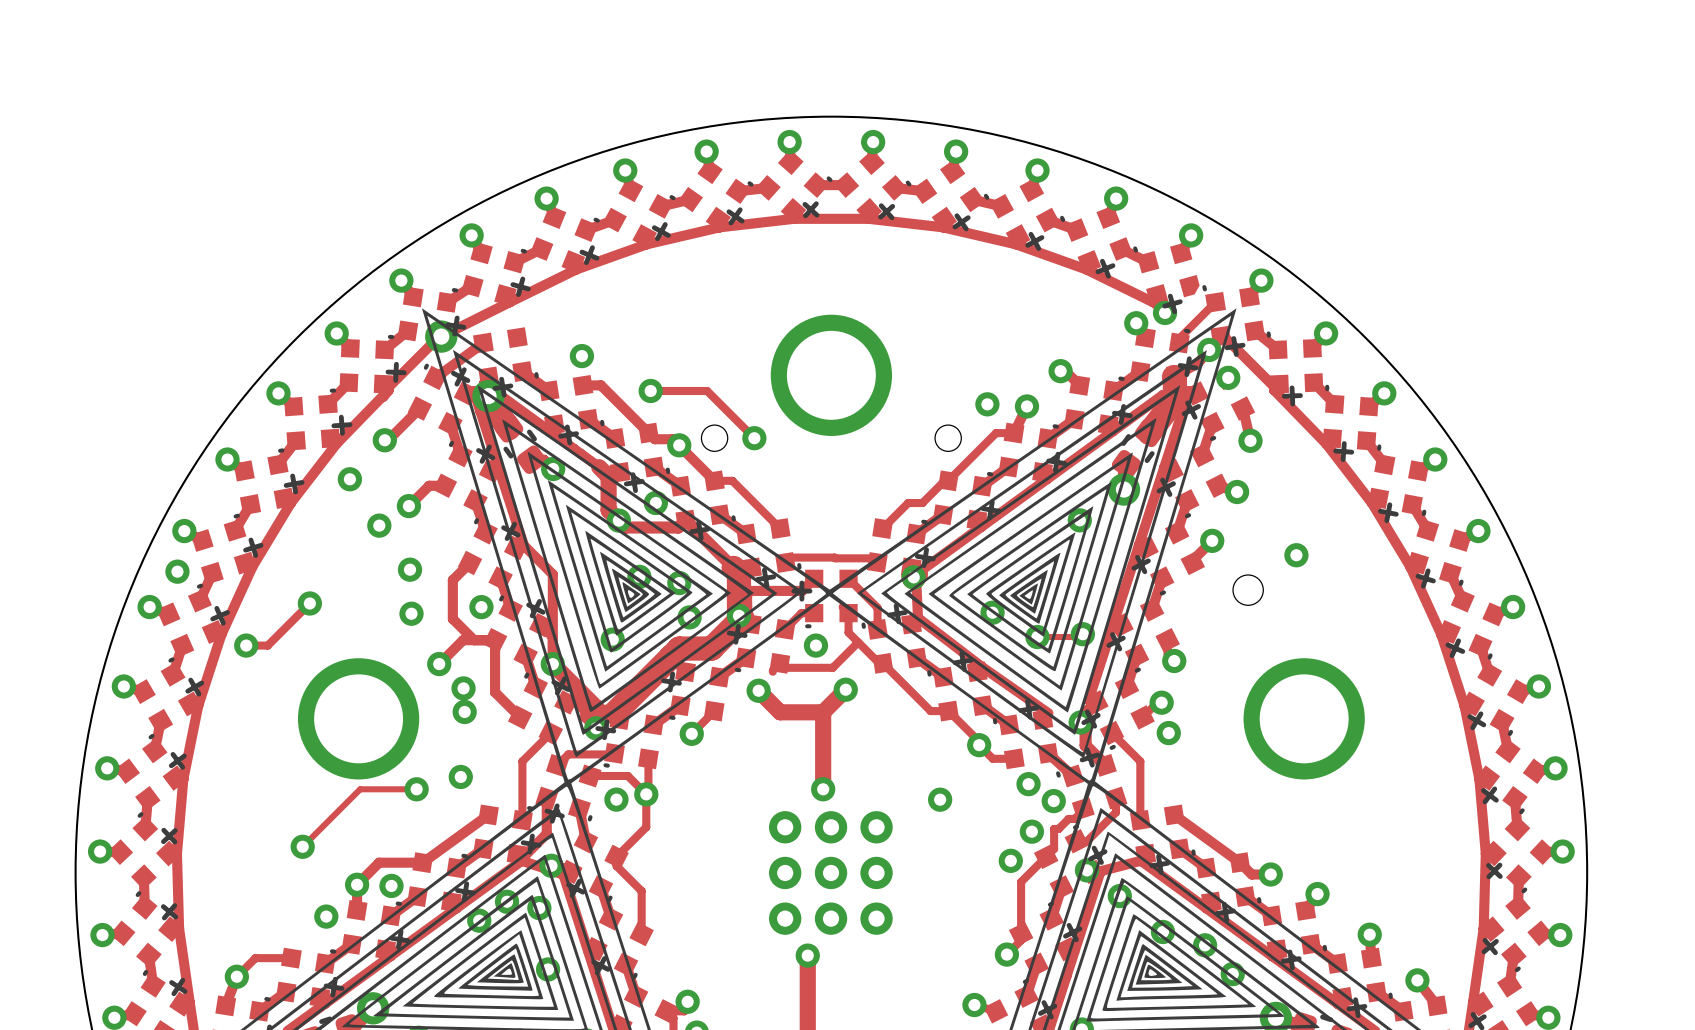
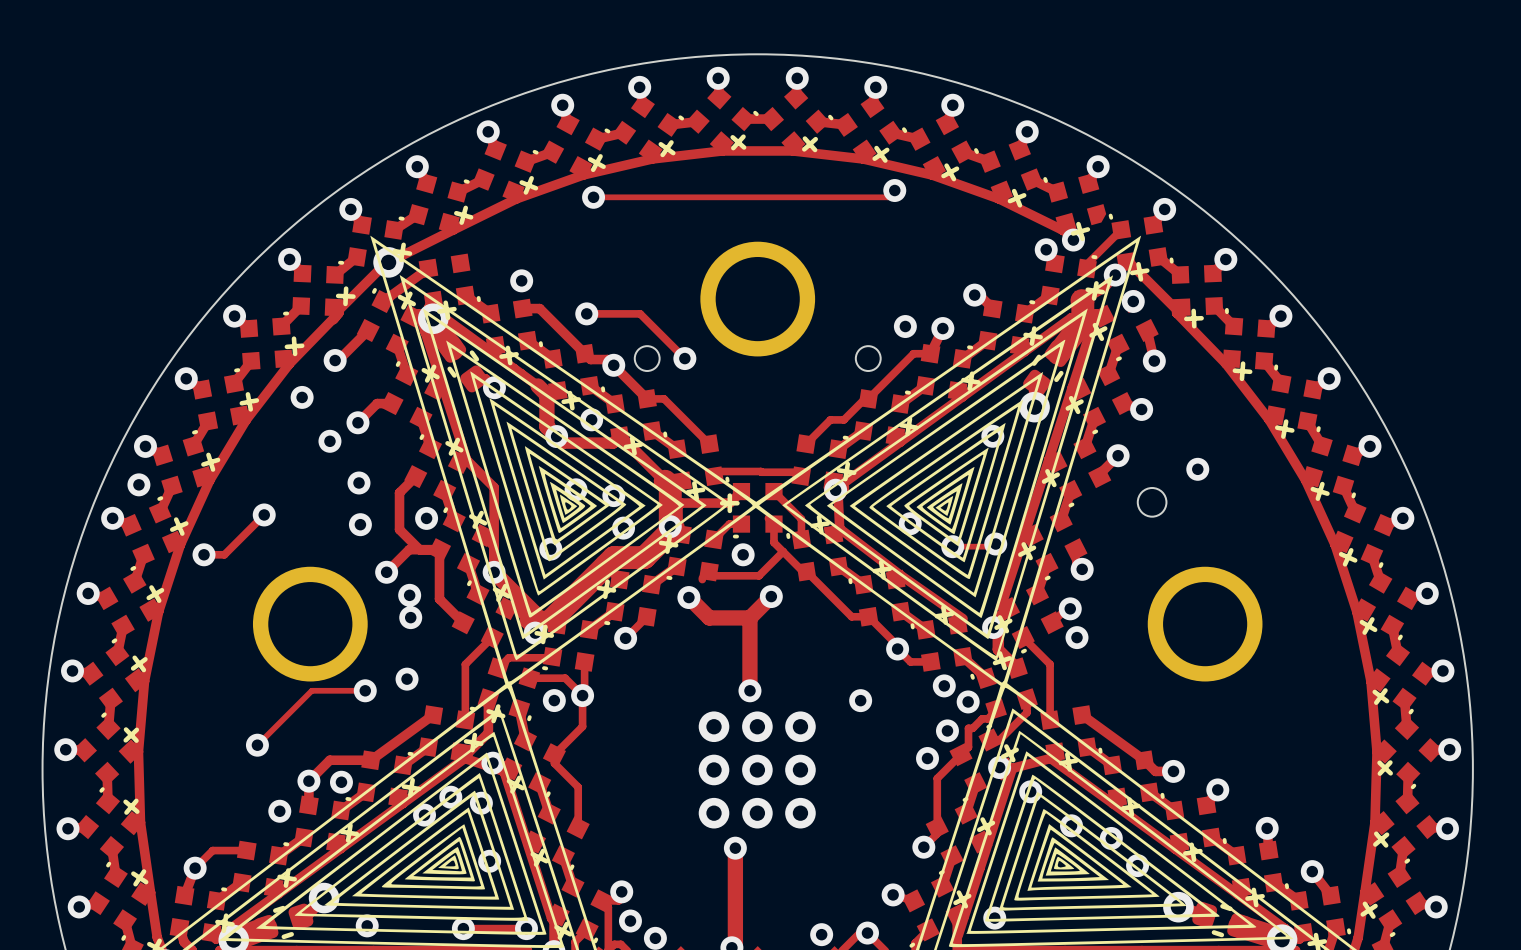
track: none -> (894, 190) (887, 197) (593, 197)
via: none -> (894, 190)
via: none -> (593, 197)

